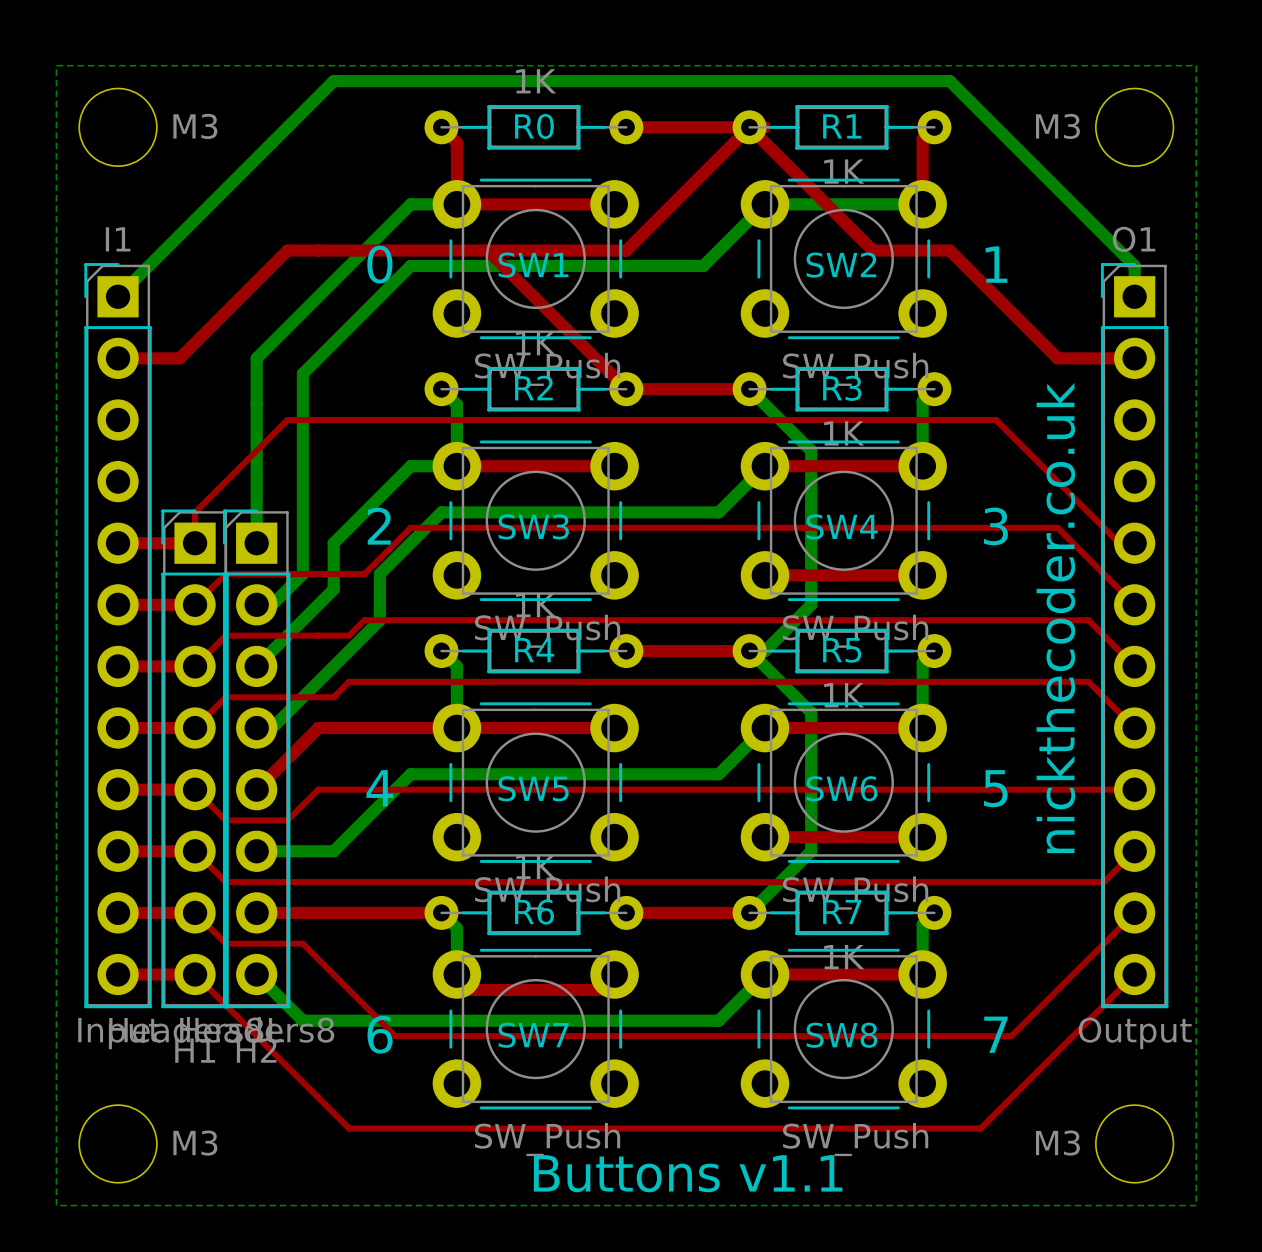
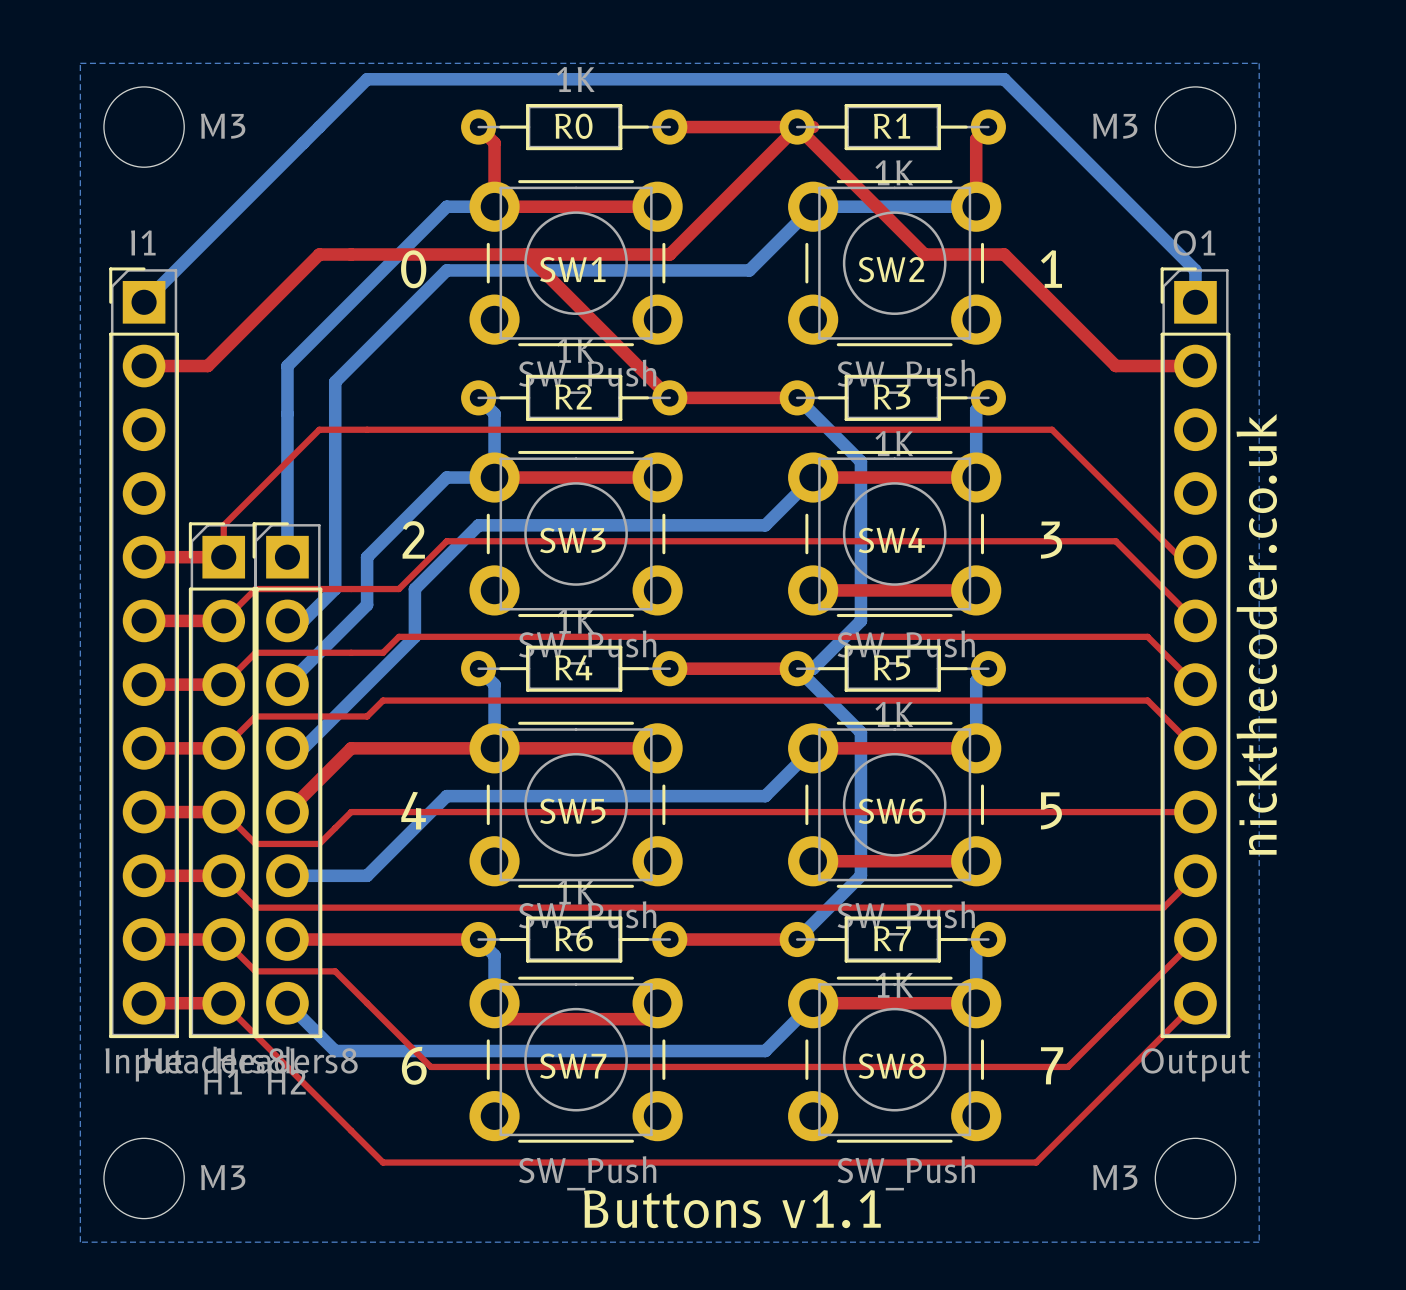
text position: nickthecoder.co.uk (1055, 618) -> nickthecoder.co.uk (1256, 634)

